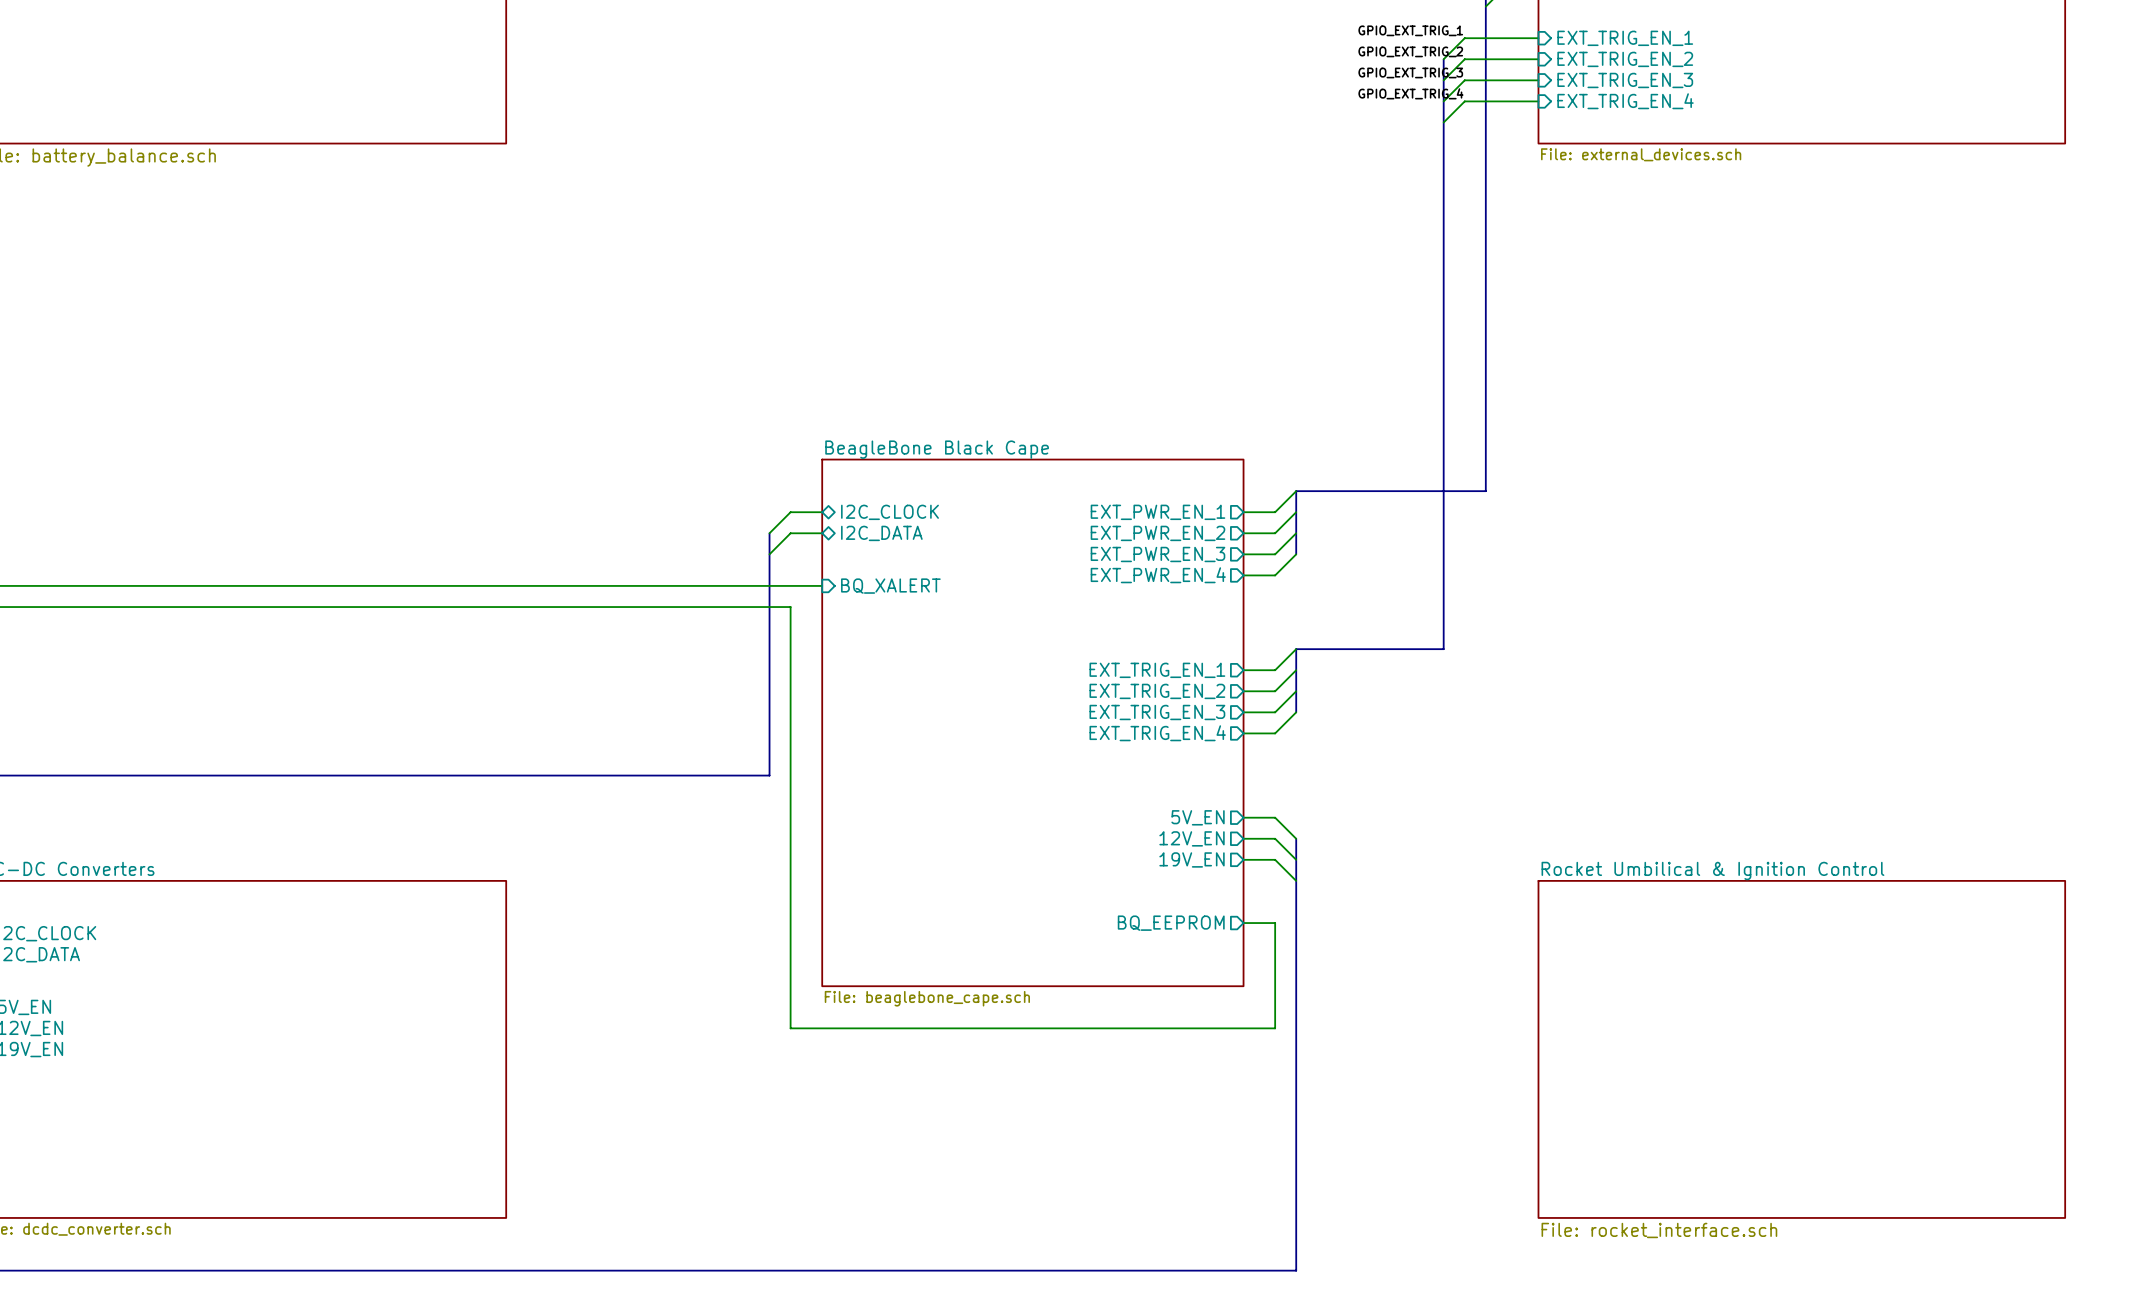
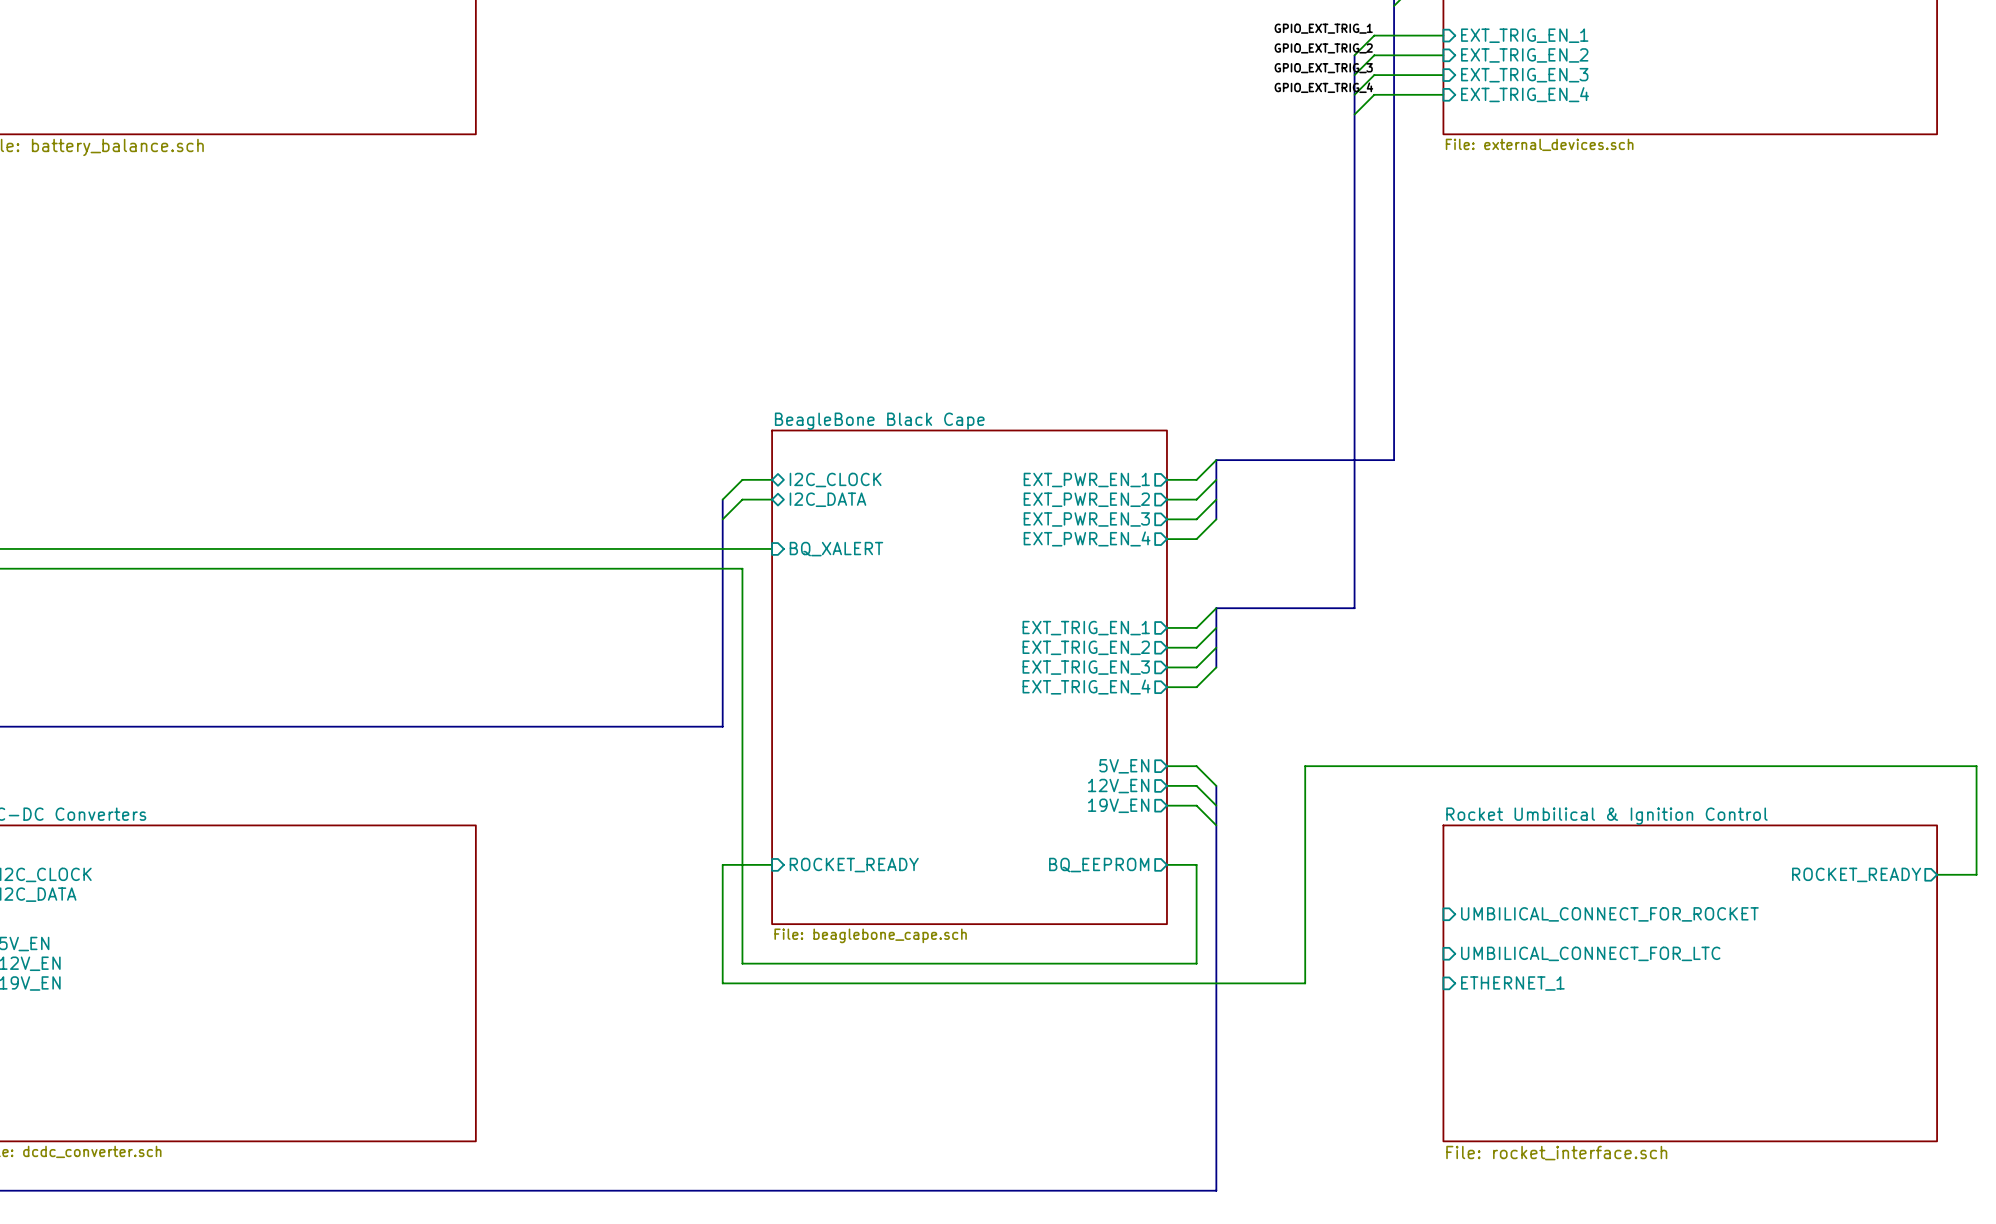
wire: none -> (772, 864) (722, 864) (722, 983) (1305, 983) (1305, 766) (1976, 766) (1976, 874) (1937, 874)
sheet pin: none -> ROCKET_READY (854, 865)
sheet pin: none -> ROCKET_READY (1856, 874)
sheet pin: none -> UMBILICAL_CONNECT_FOR_ROCKET (1609, 914)
sheet pin: none -> UMBILICAL_CONNECT_FOR_LTC (1590, 953)
sheet pin: none -> ETHERNET_1 (1512, 983)

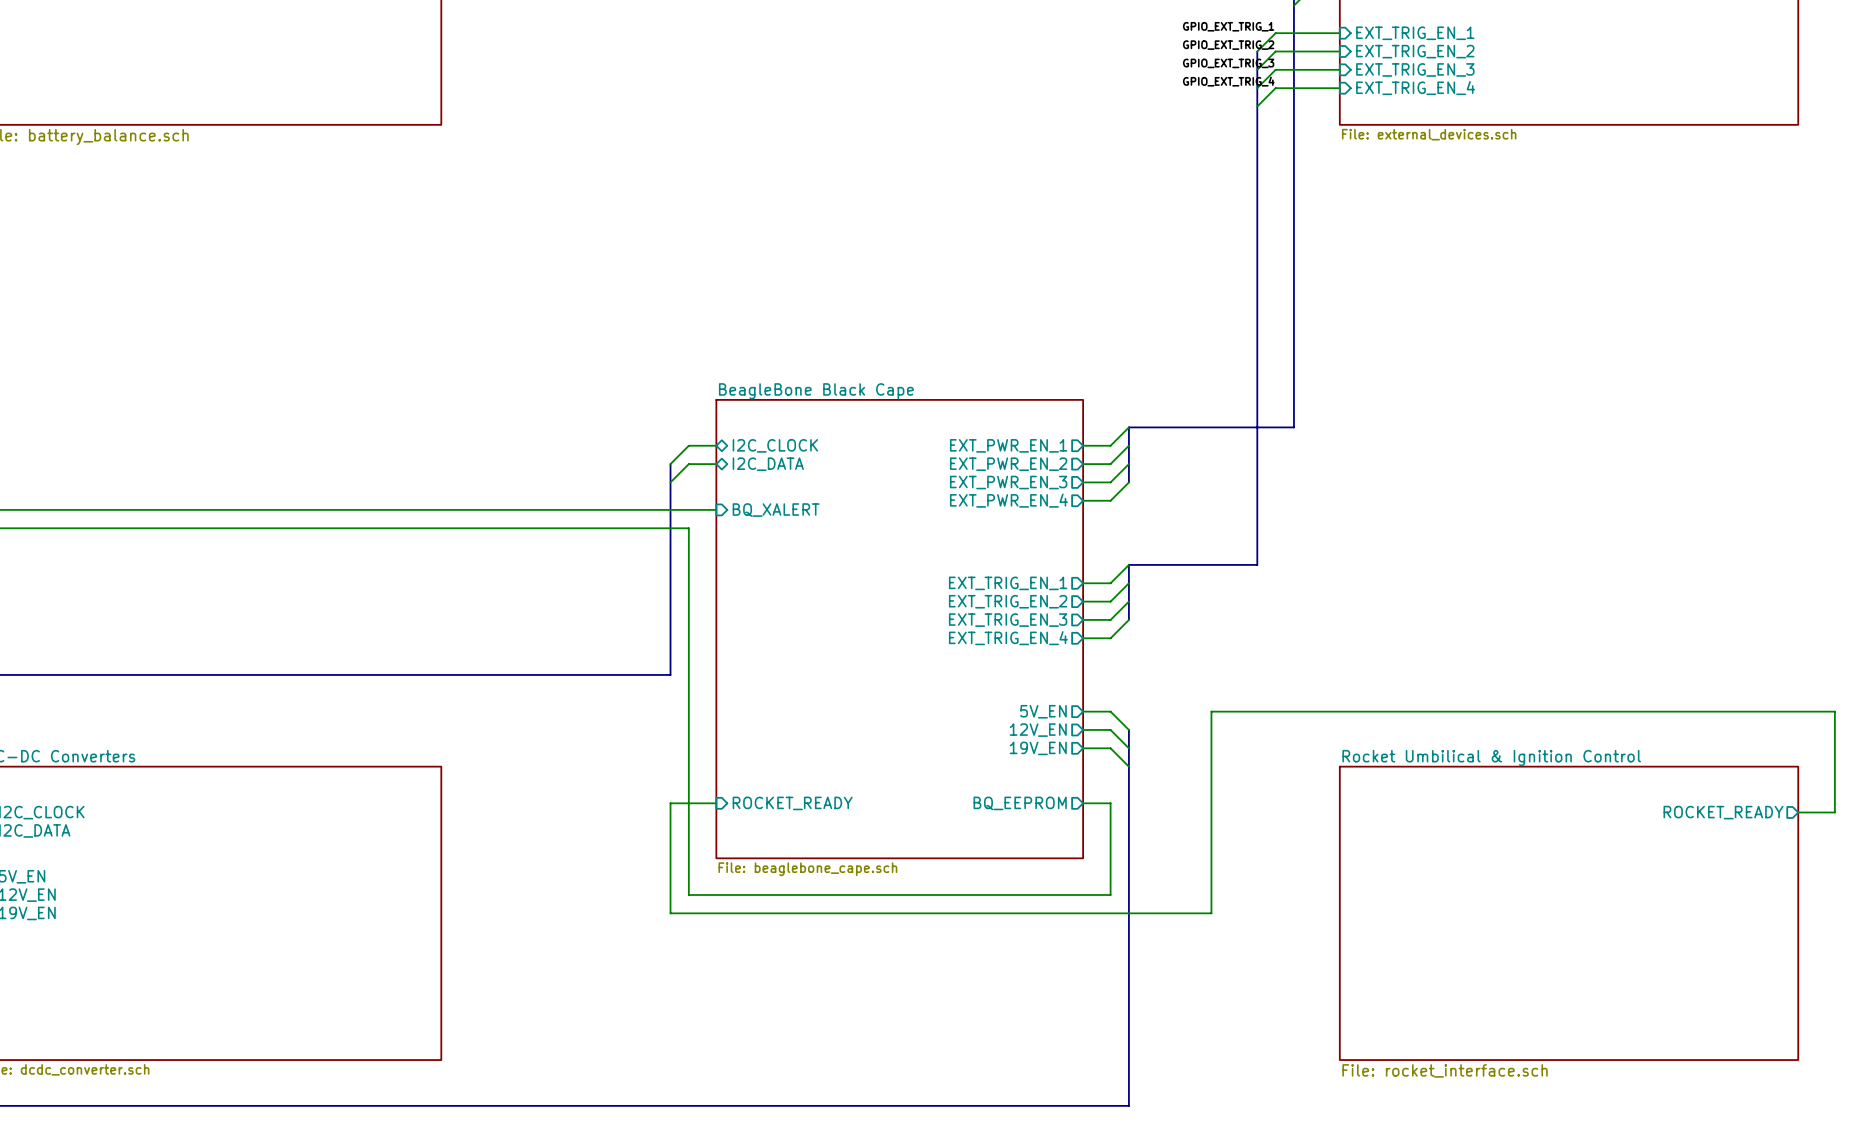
sheet pin: UMBILICAL_CONNECT_FOR_ROCKET (1609, 914) -> none
sheet pin: UMBILICAL_CONNECT_FOR_LTC (1590, 953) -> none
sheet pin: ETHERNET_1 (1512, 983) -> none

